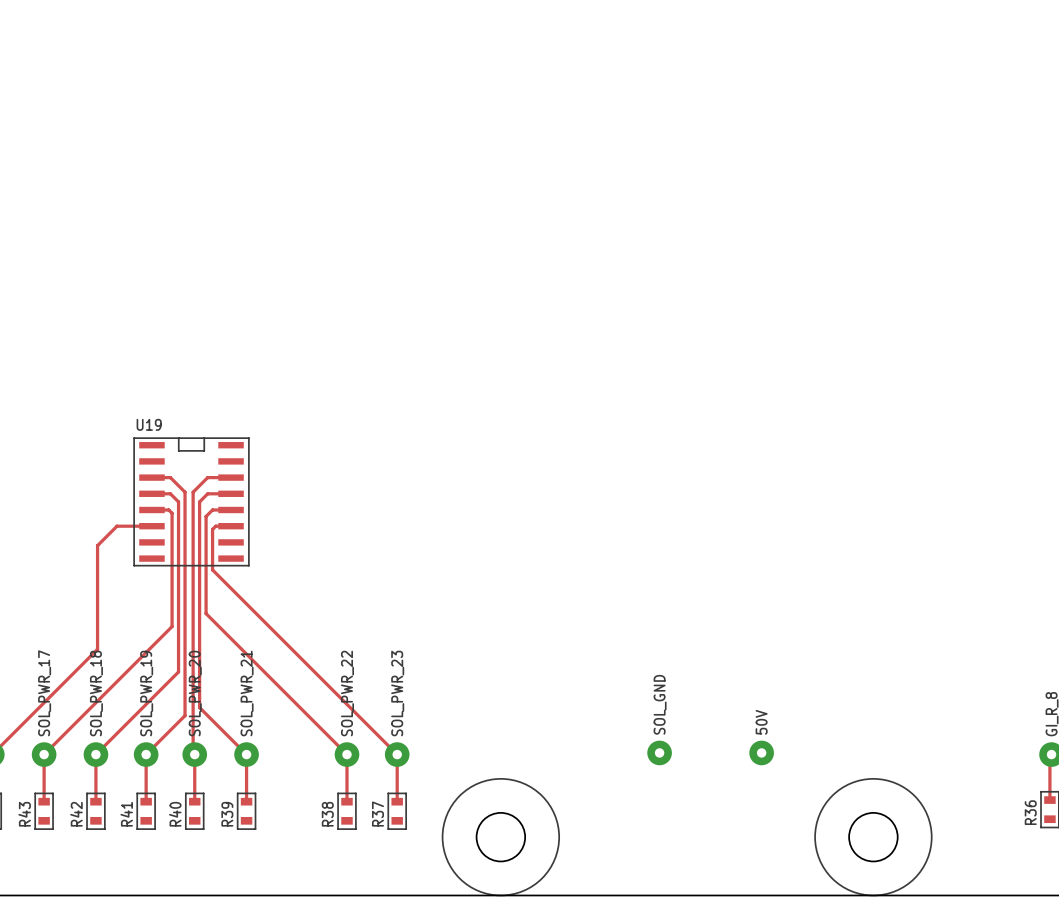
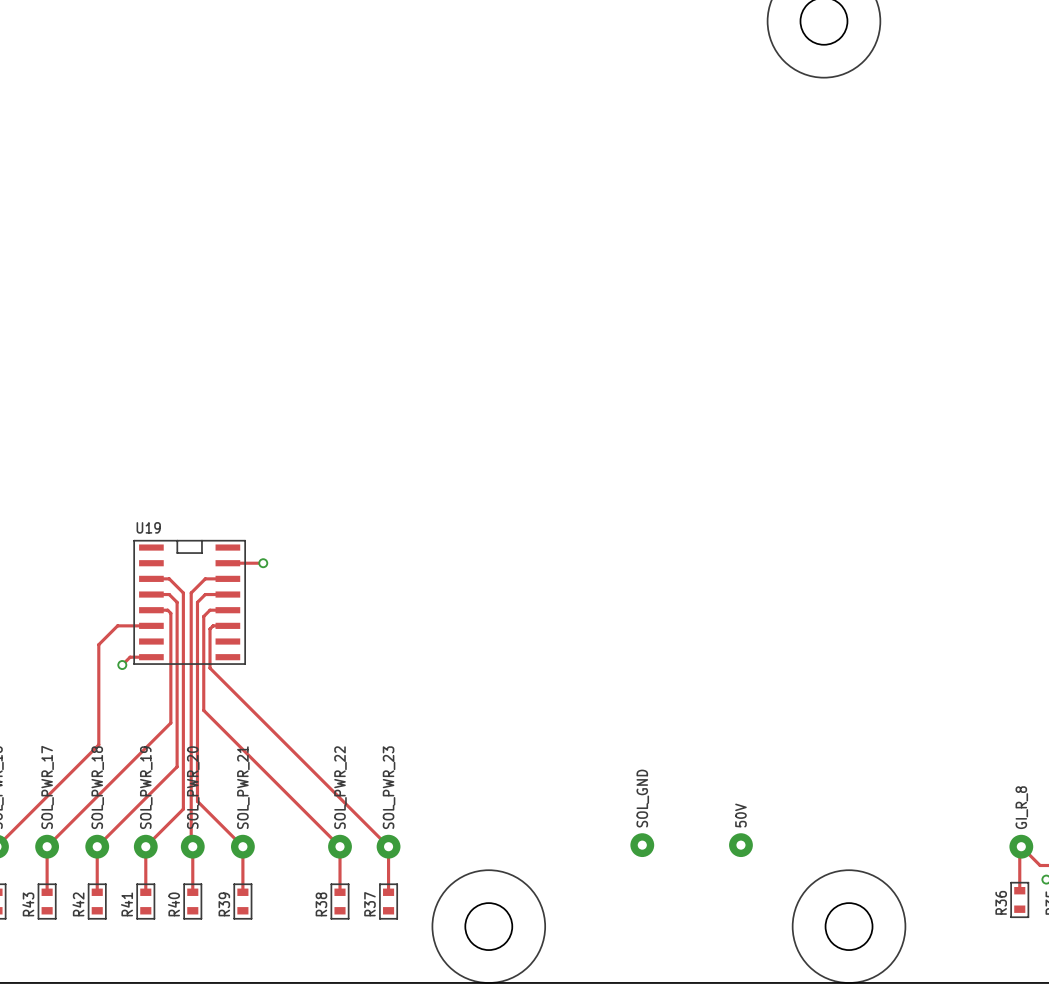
track: none -> (227, 563) (263, 563)
via: none -> (263, 563)
track: none -> (151, 657) (130, 657) (122, 665)
via: none -> (122, 665)

